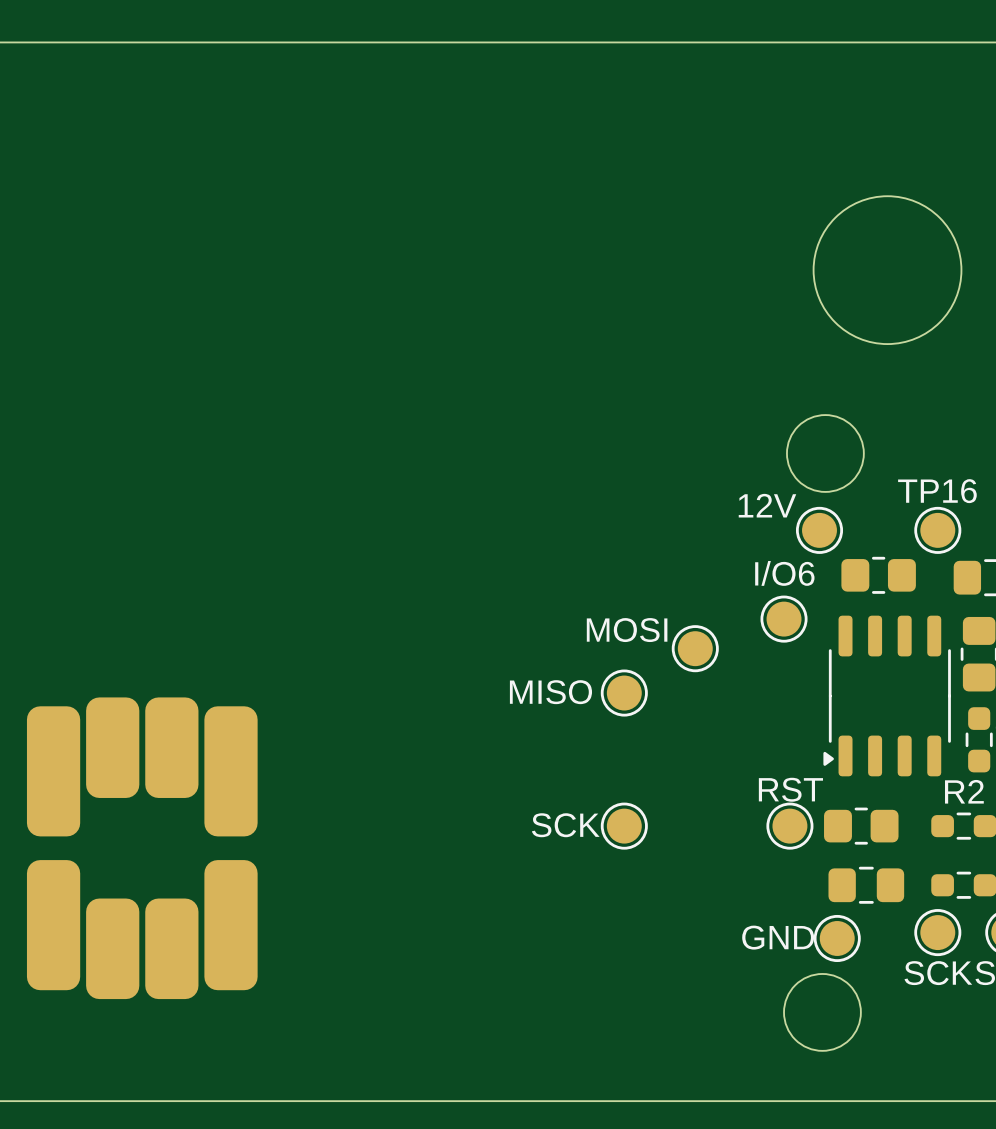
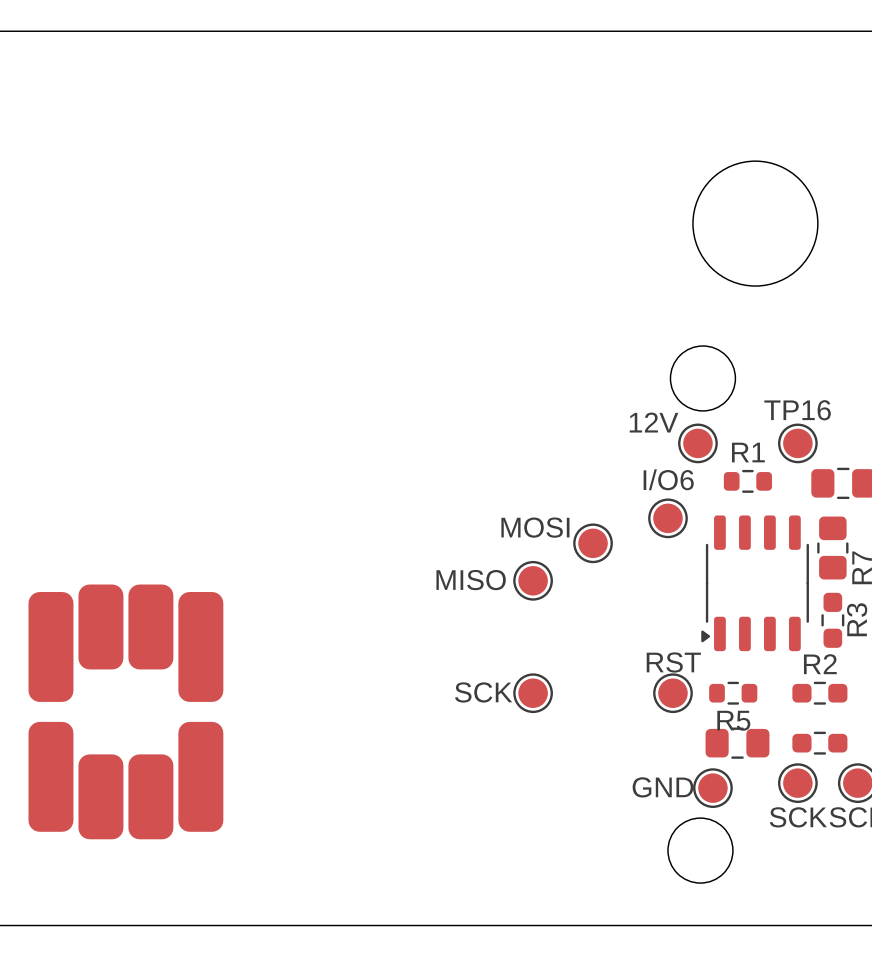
part: (878, 575) -> none
R1: none -> (747, 481)
part: (861, 826) -> none
R5: none -> (733, 693)

